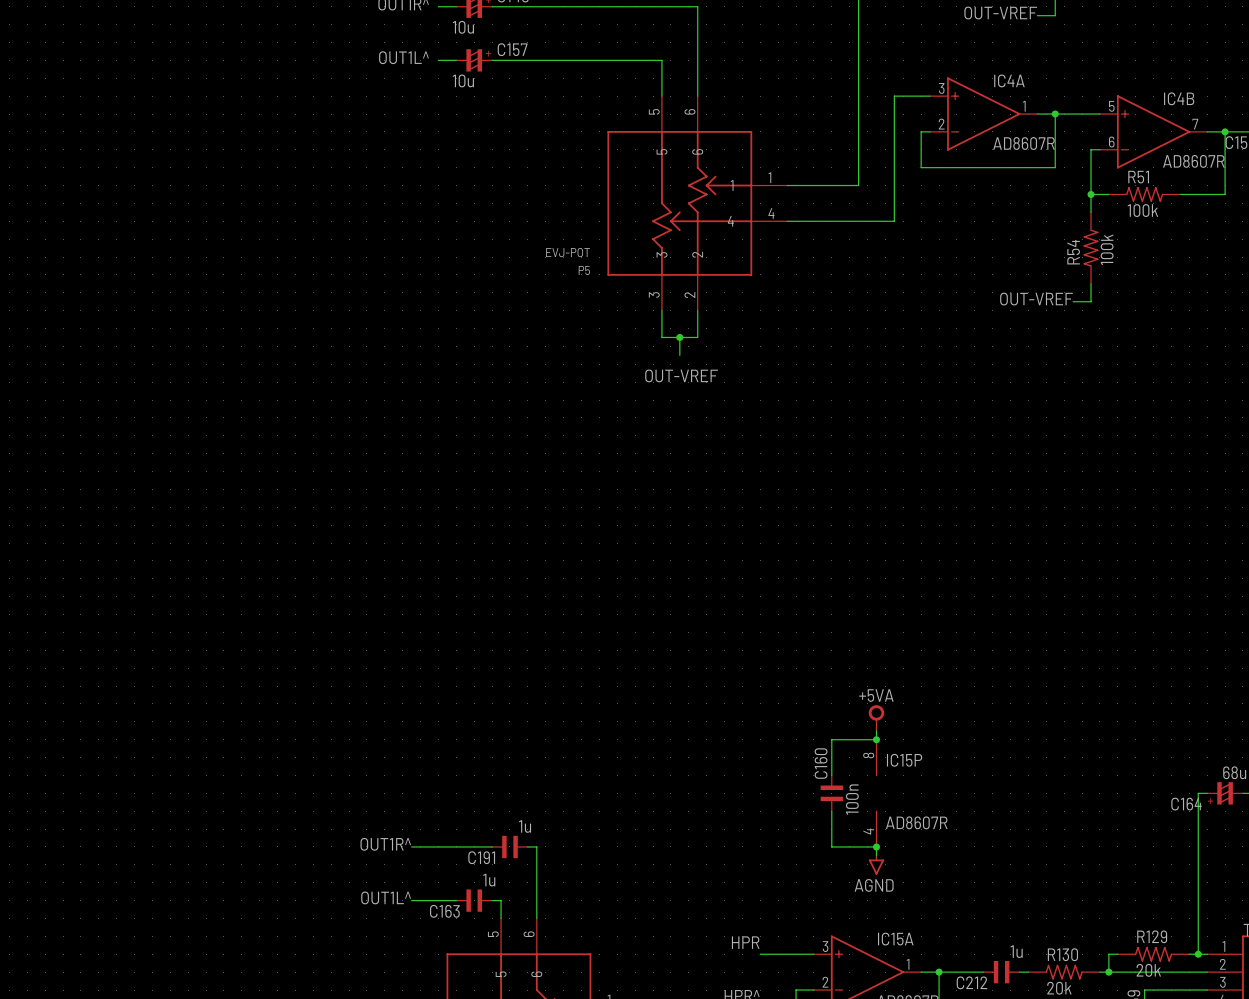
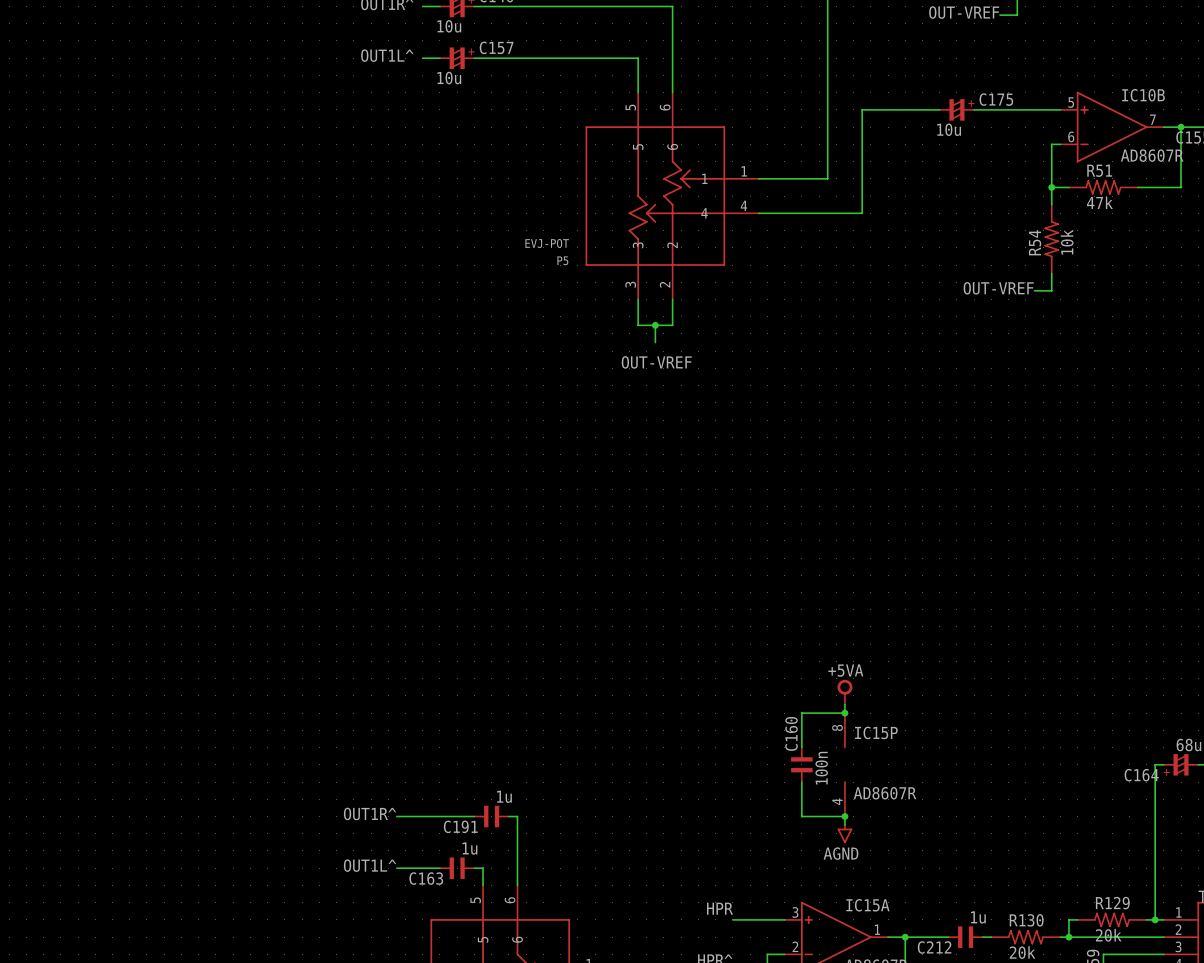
wire: (930, 96) (894, 96) (894, 114) -> (939, 109) (862, 109)
IC4B name: IC4B (1179, 98) -> IC10B (1143, 95)
IC4A: AD8607R (983, 114) -> none
C175: none -> 10u (956, 109)
wire: (1055, 114) (1055, 167) (921, 167) (921, 131) (930, 131) -> none
junction: (1055, 114) -> none
R51 value: 100k (1142, 210) -> 47k (1099, 202)
R54 value: 100k (1107, 249) -> 10k (1067, 242)

